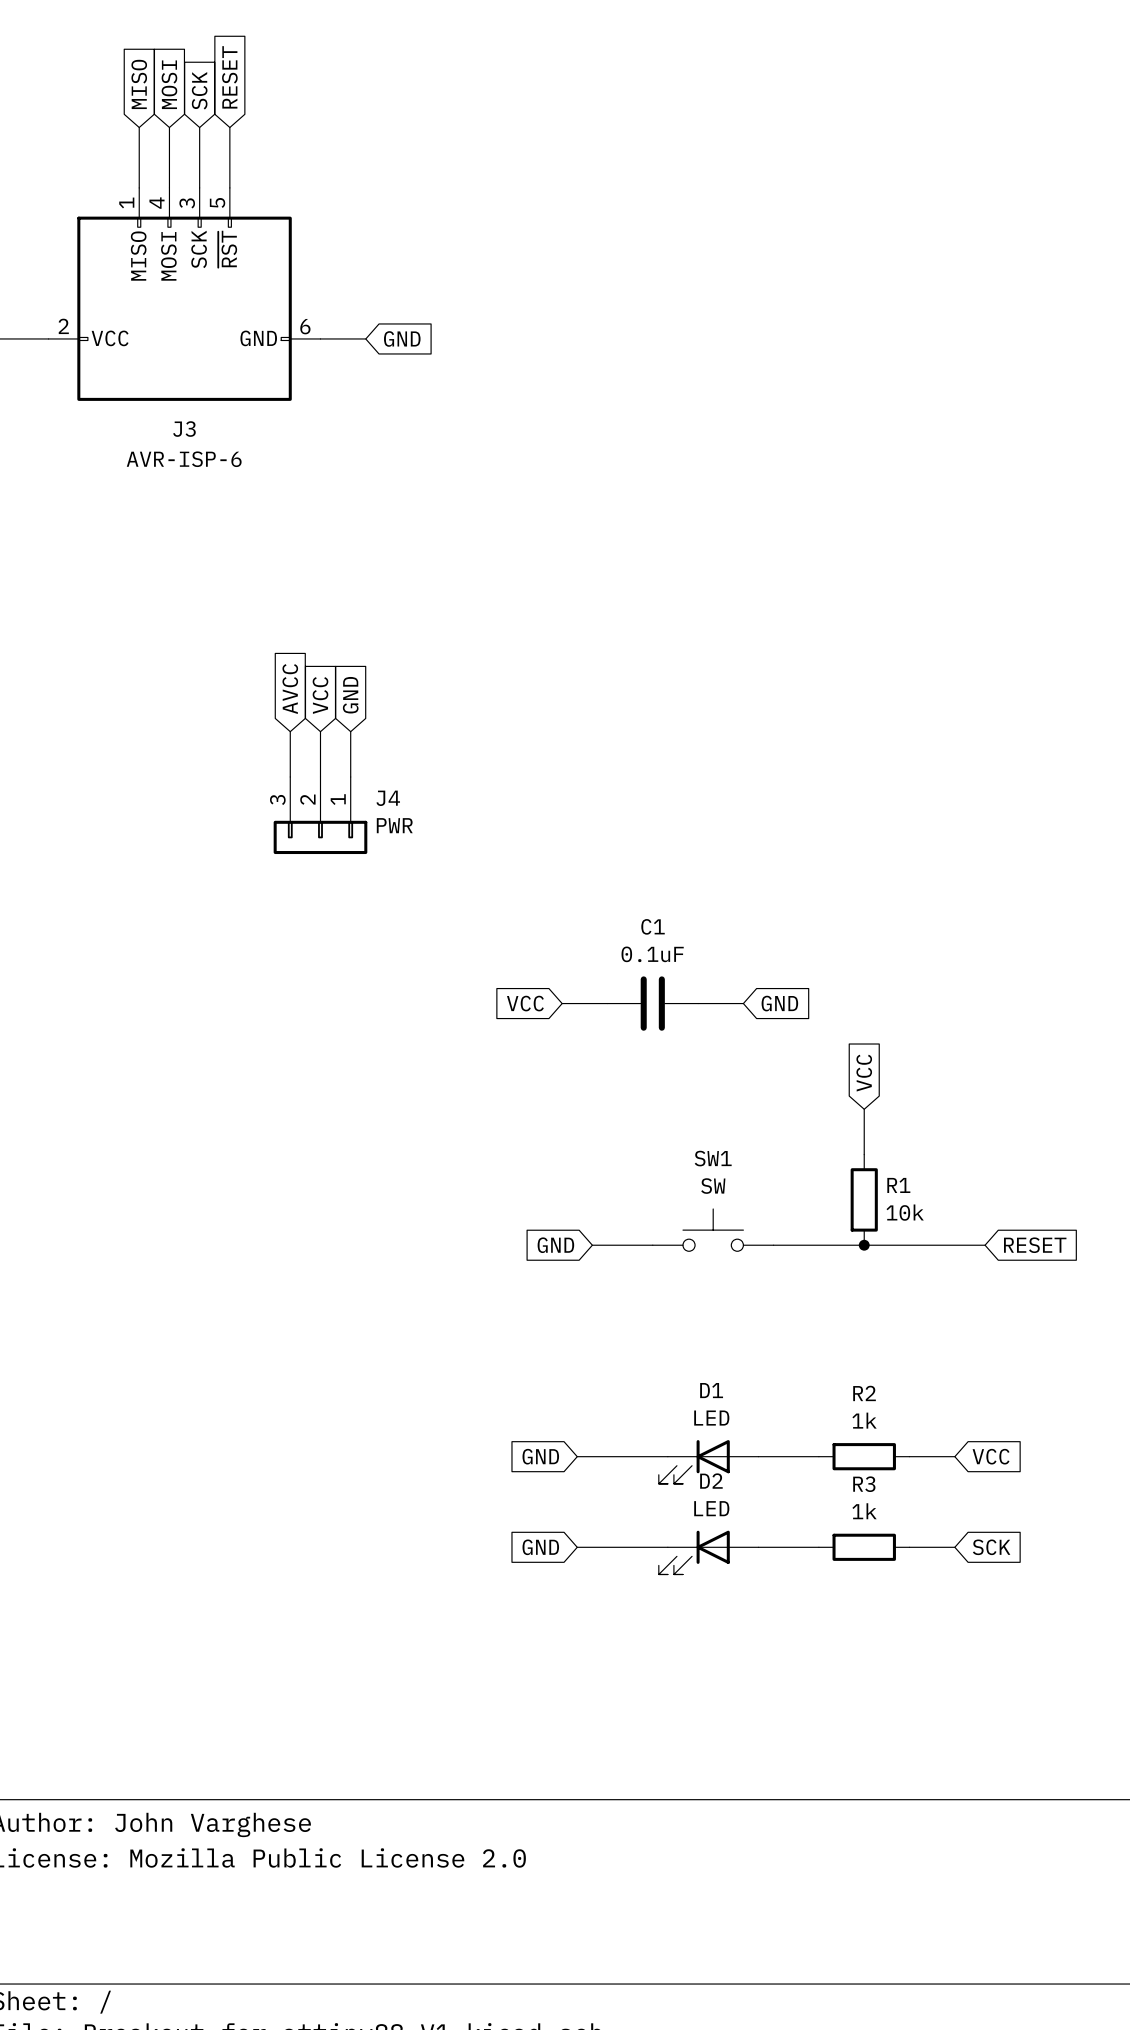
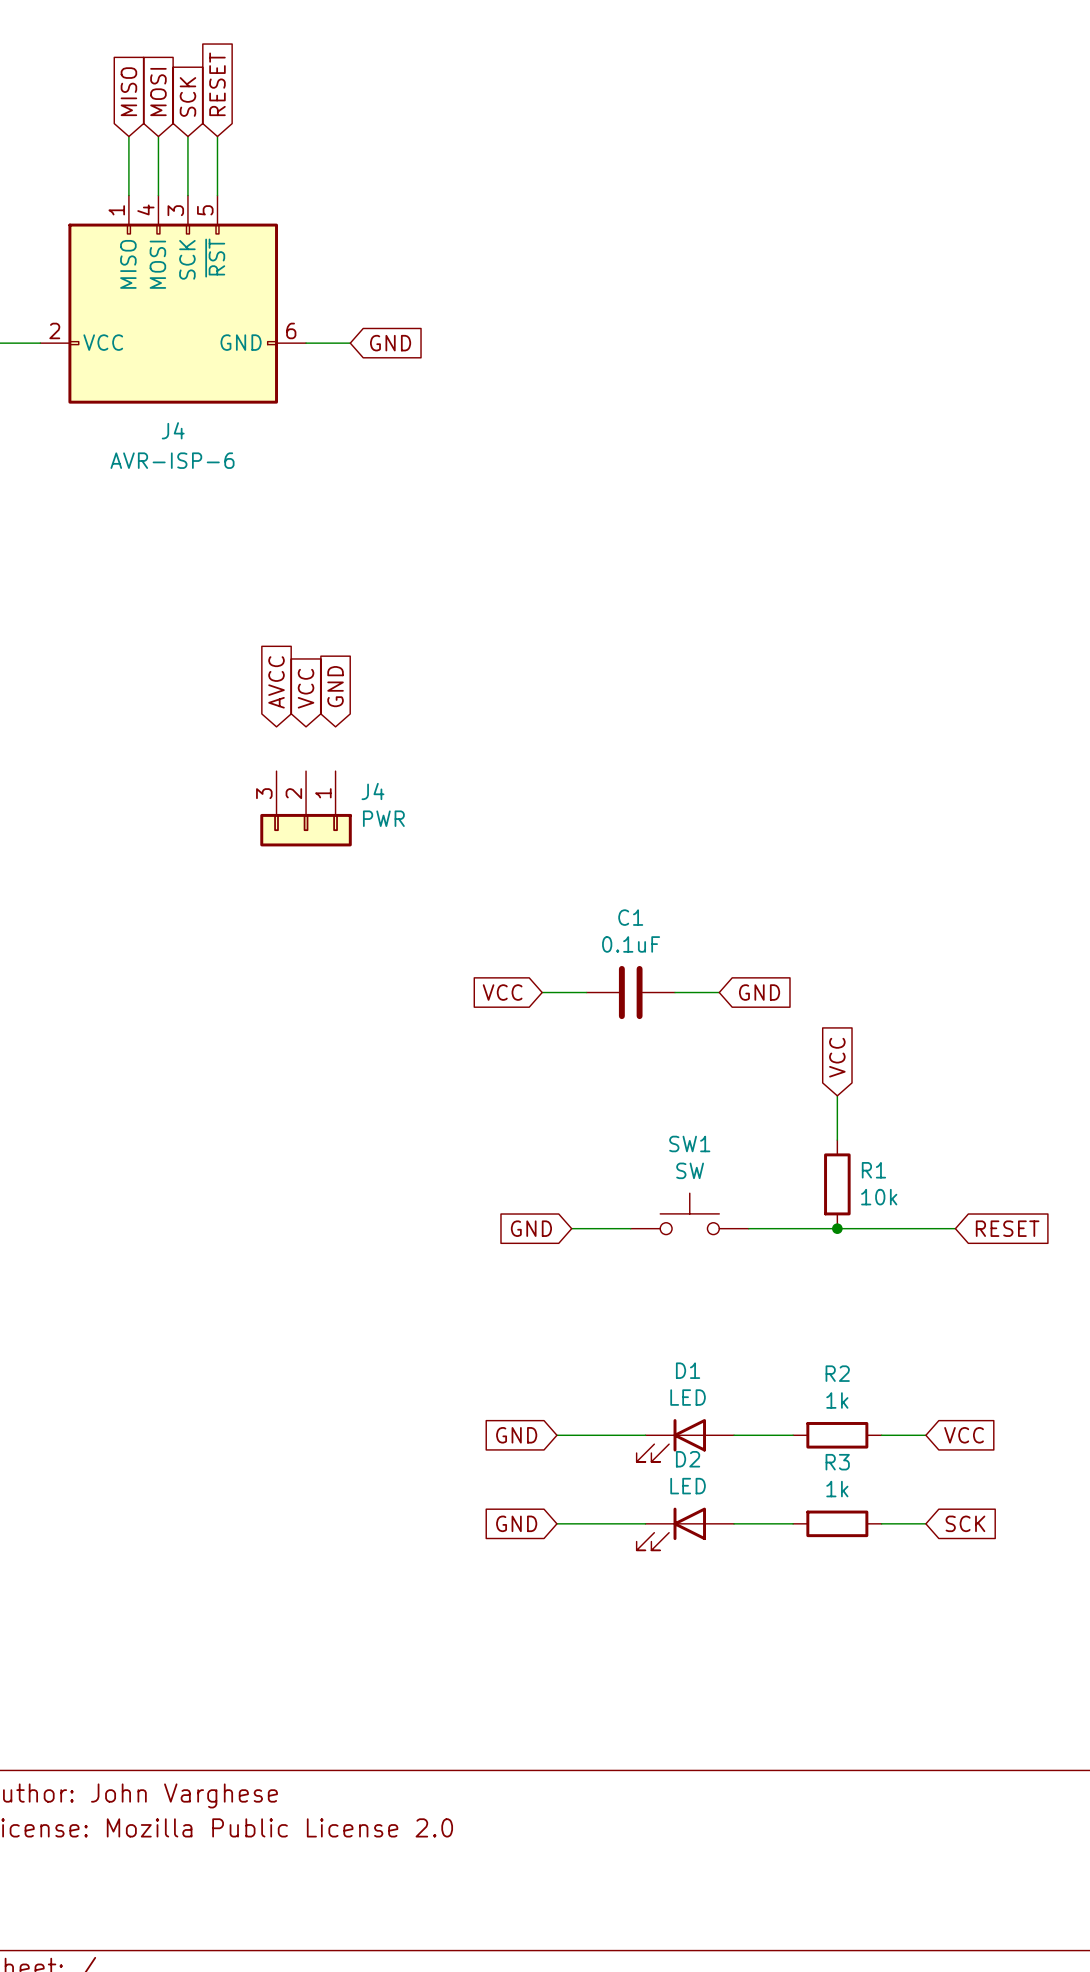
J3 name: J3 (184, 429) -> J4 (173, 430)
wire: (290, 731) (290, 776) -> none
wire: (320, 731) (320, 776) -> none
wire: (350, 731) (350, 776) -> none

